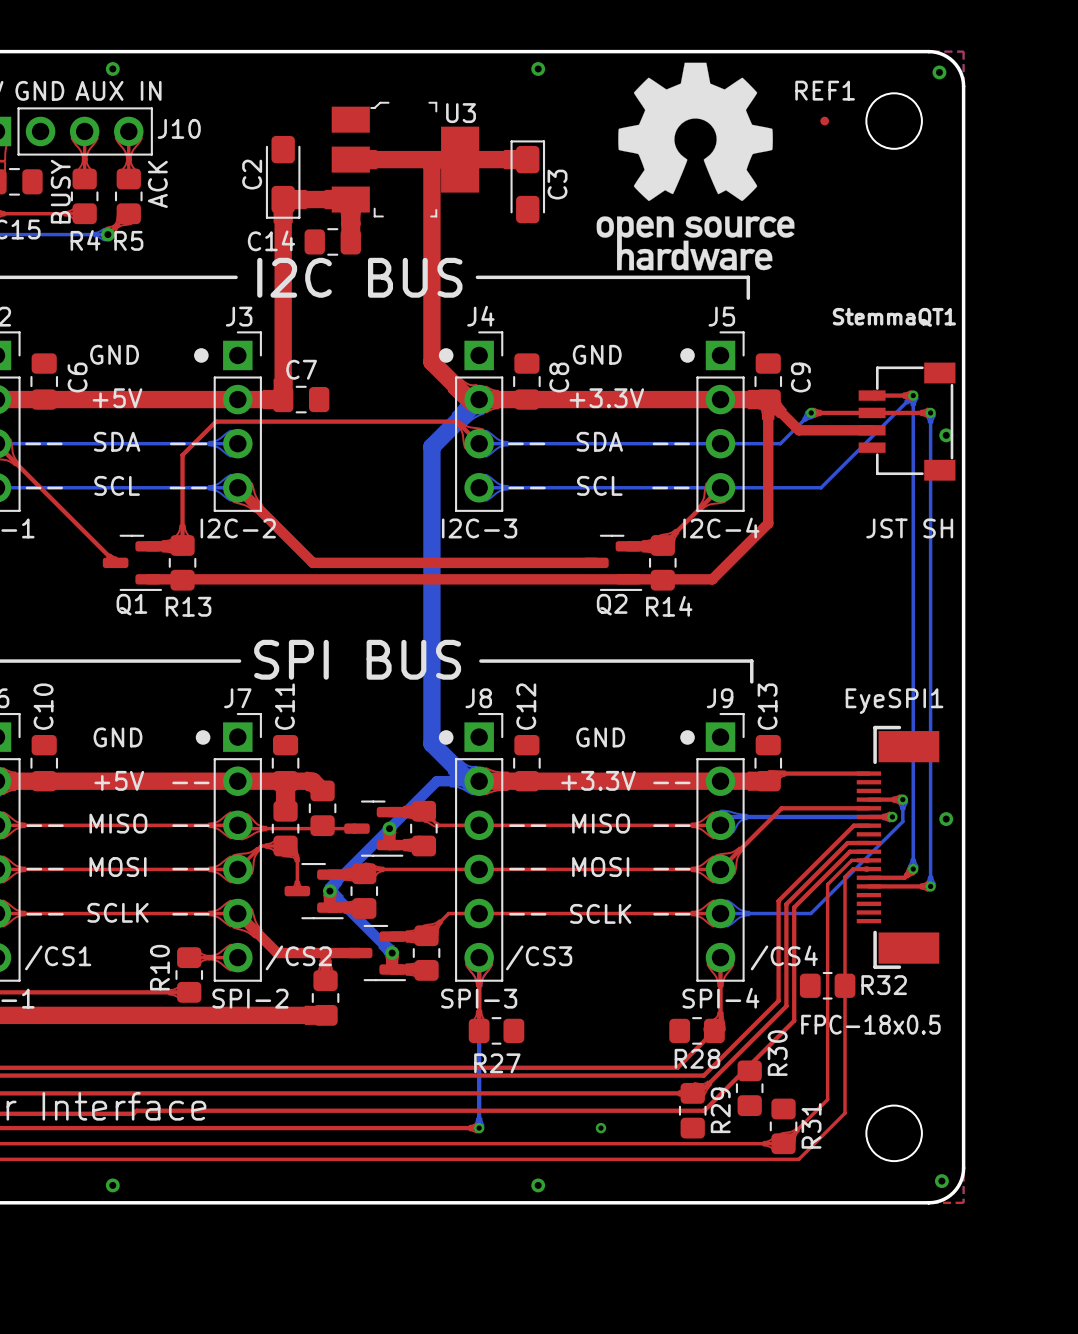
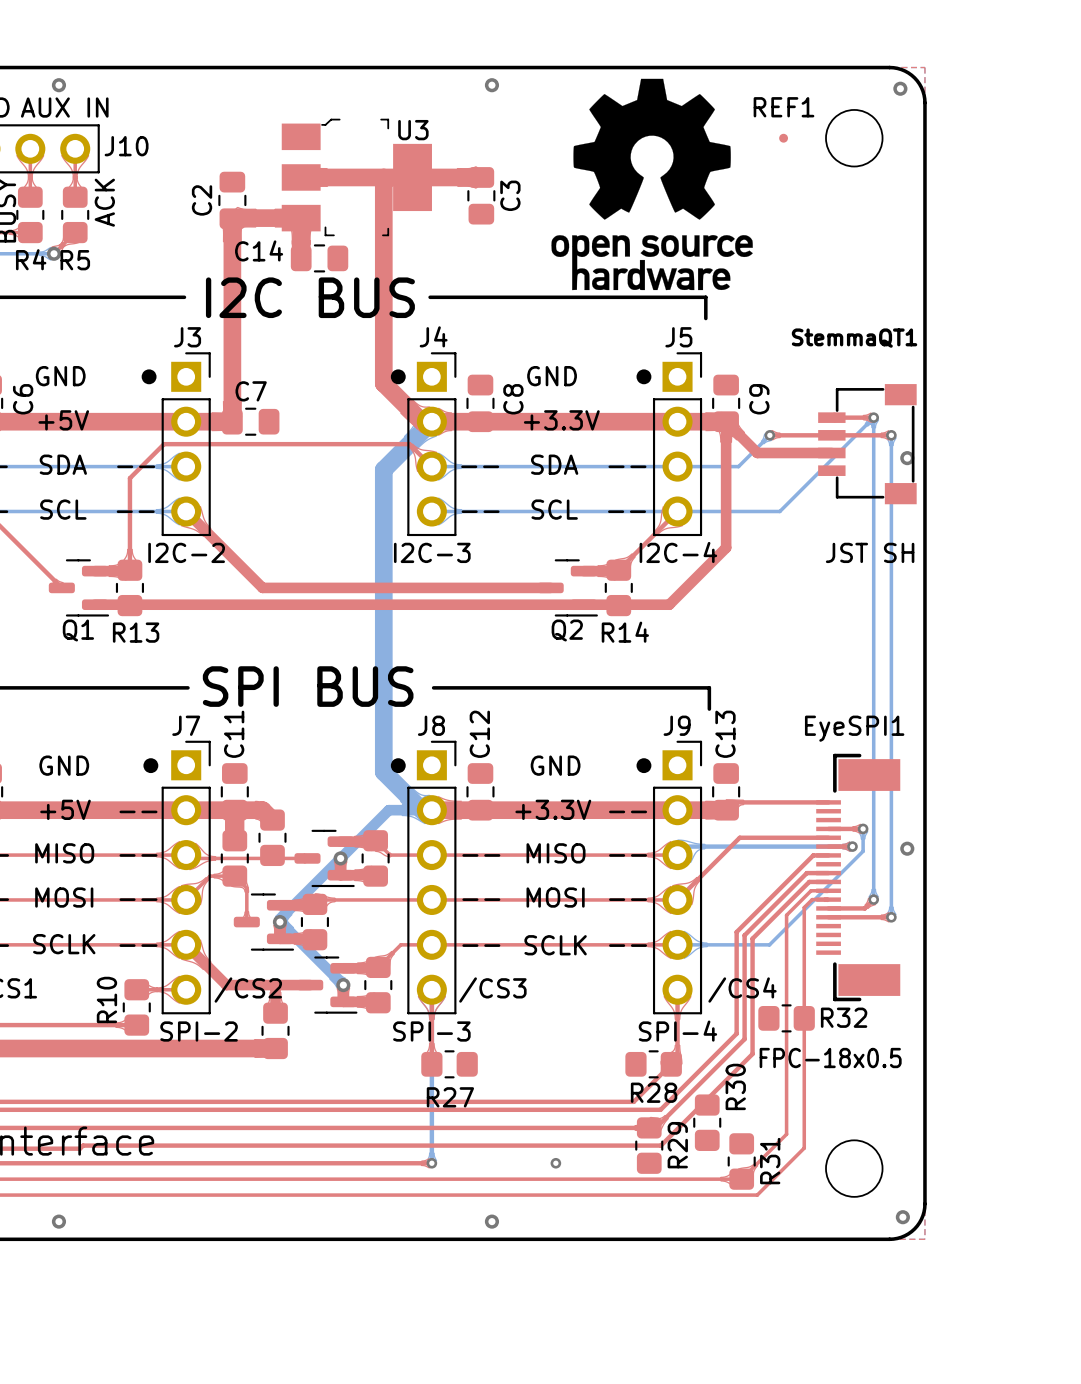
C2 footprint: [265, 135, 301, 219] -> [218, 171, 247, 230]
C3 footprint: [510, 140, 546, 224] -> [467, 167, 496, 225]
C14 name position: C14 (271, 240) -> C14 (259, 250)
C14 position: (332, 241) -> (319, 258)

